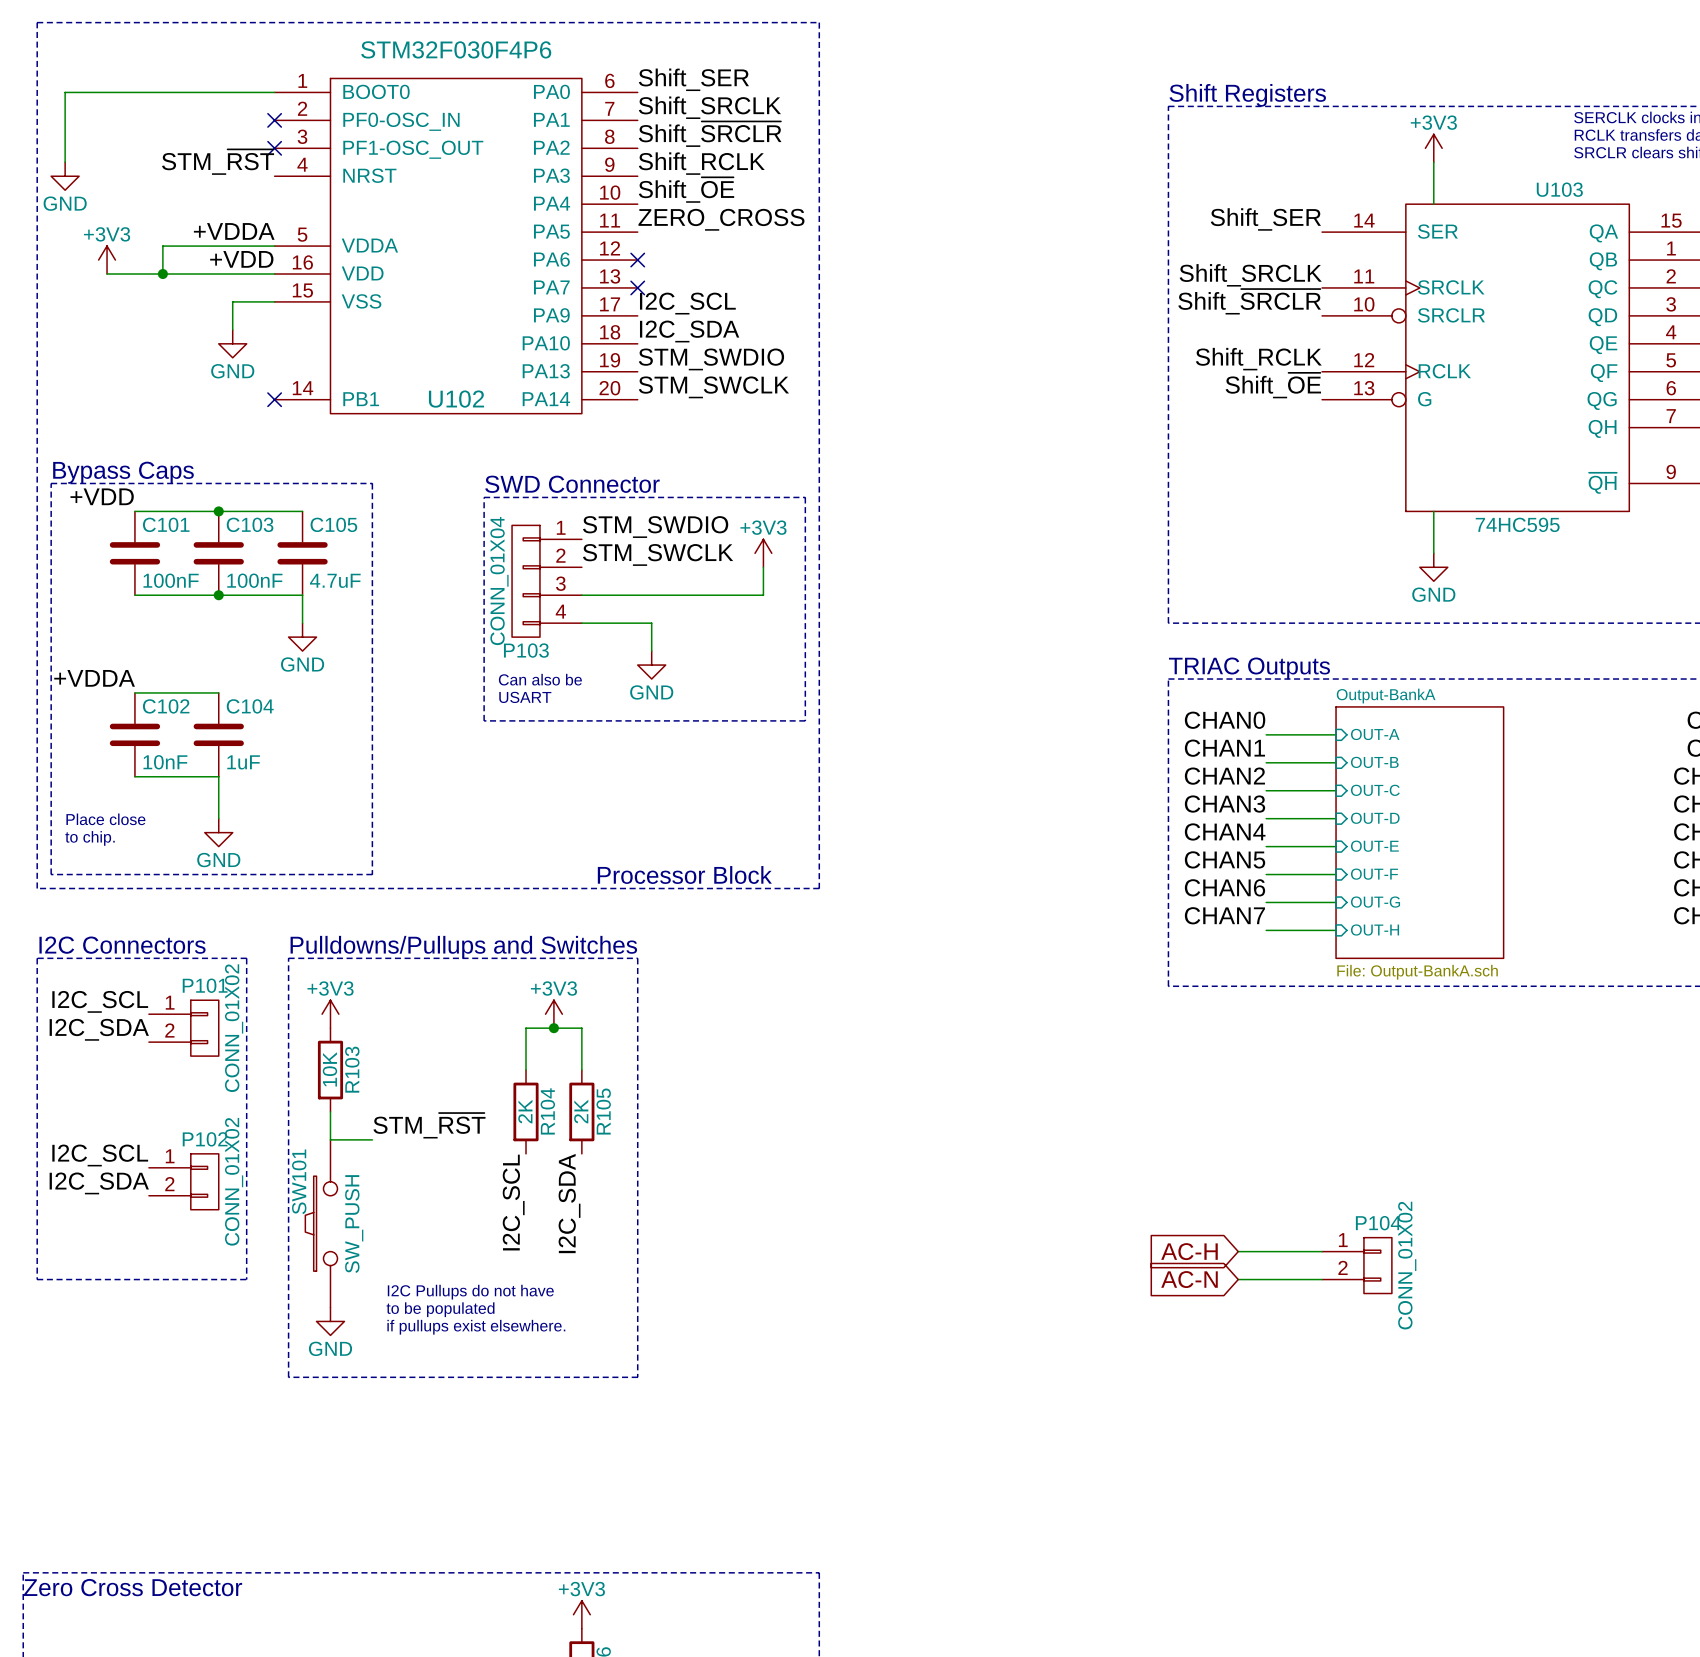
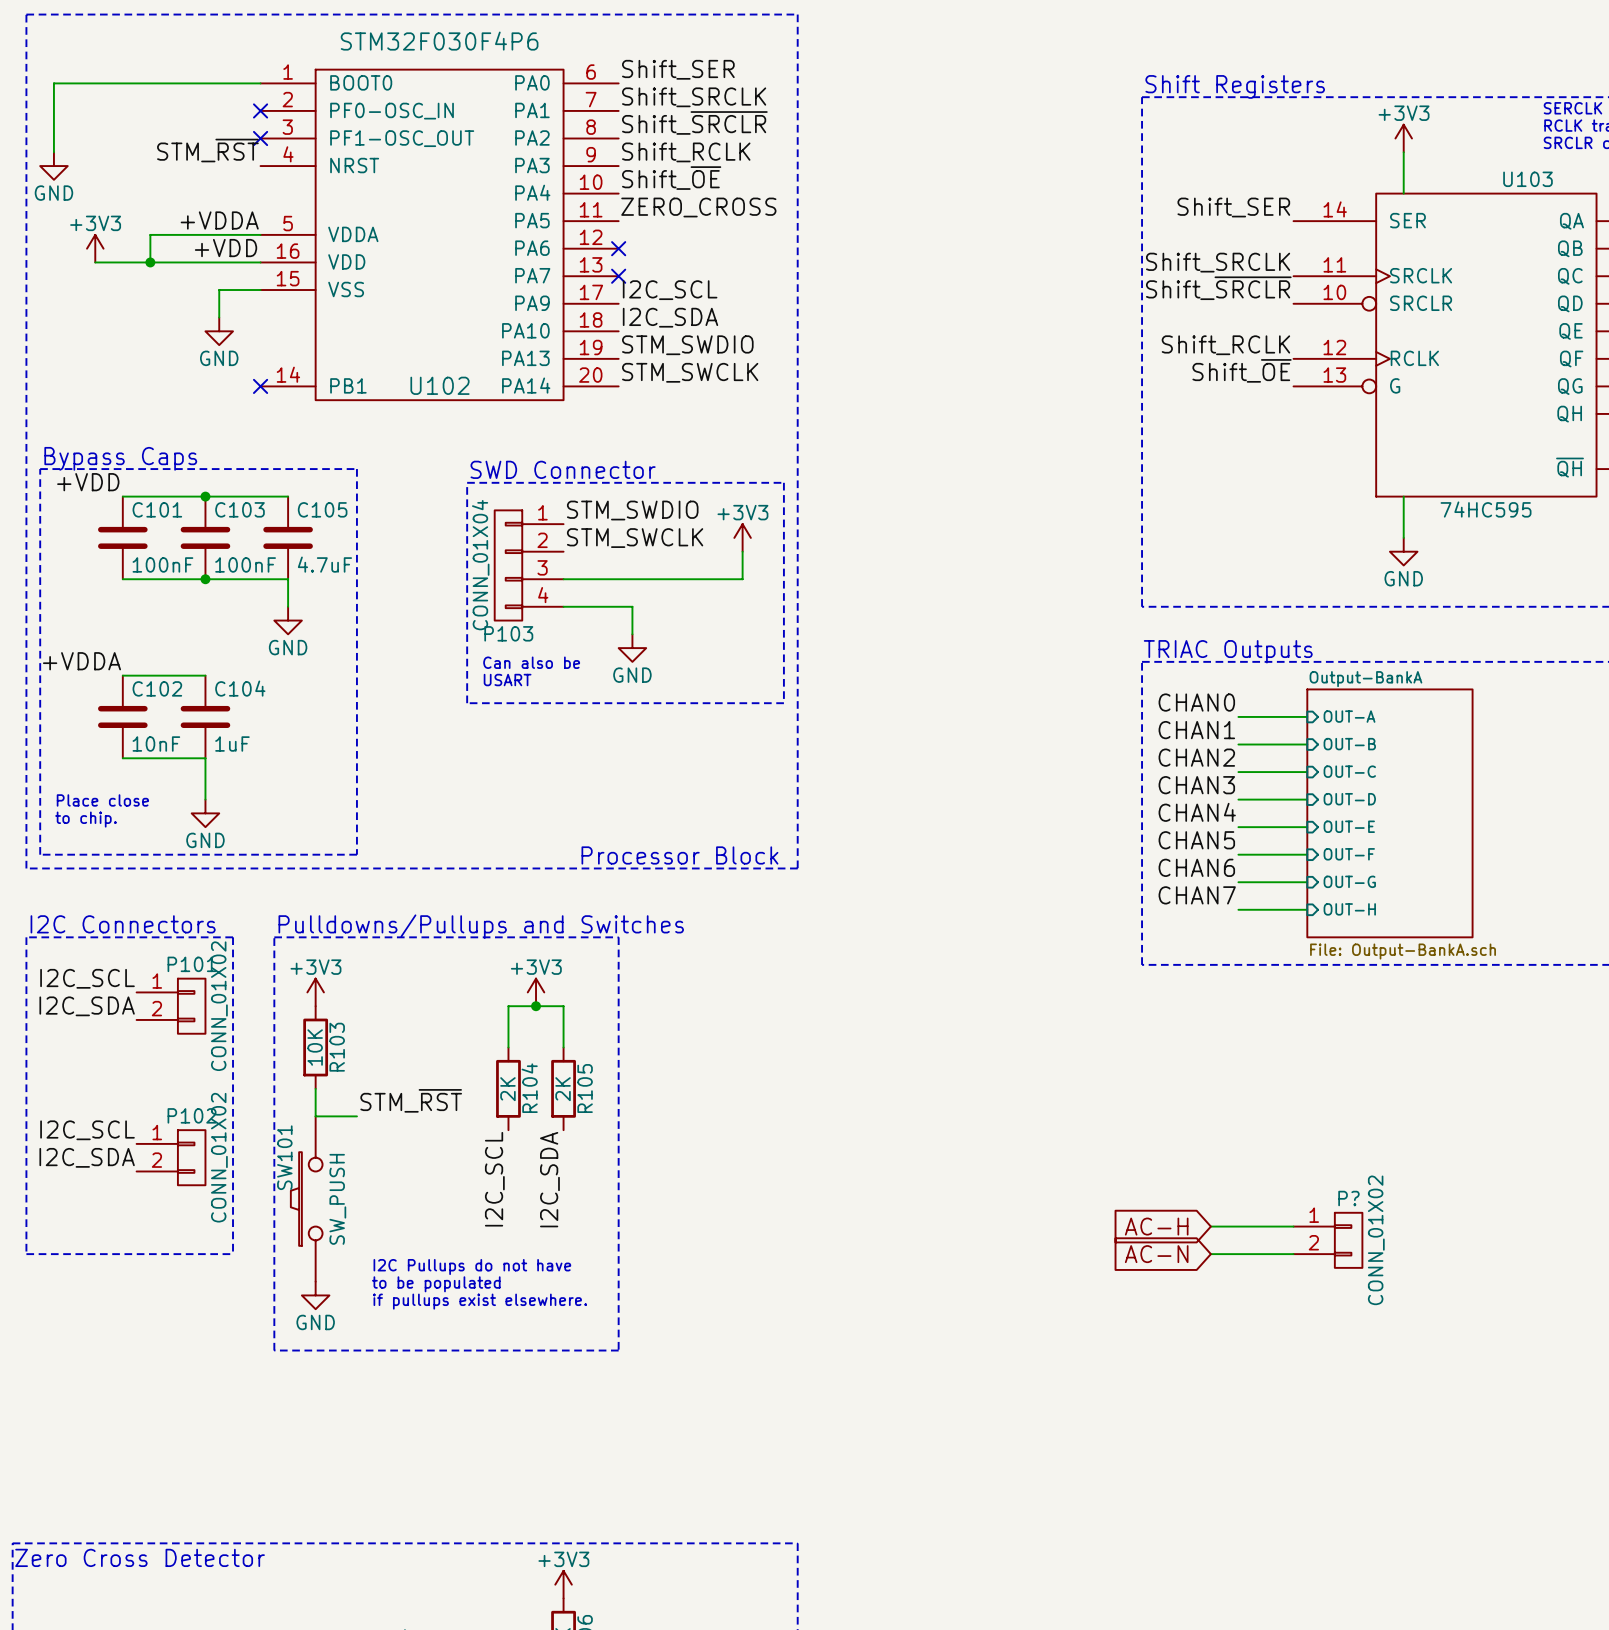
P104 name: P104 (1378, 1223) -> P? (1348, 1198)

